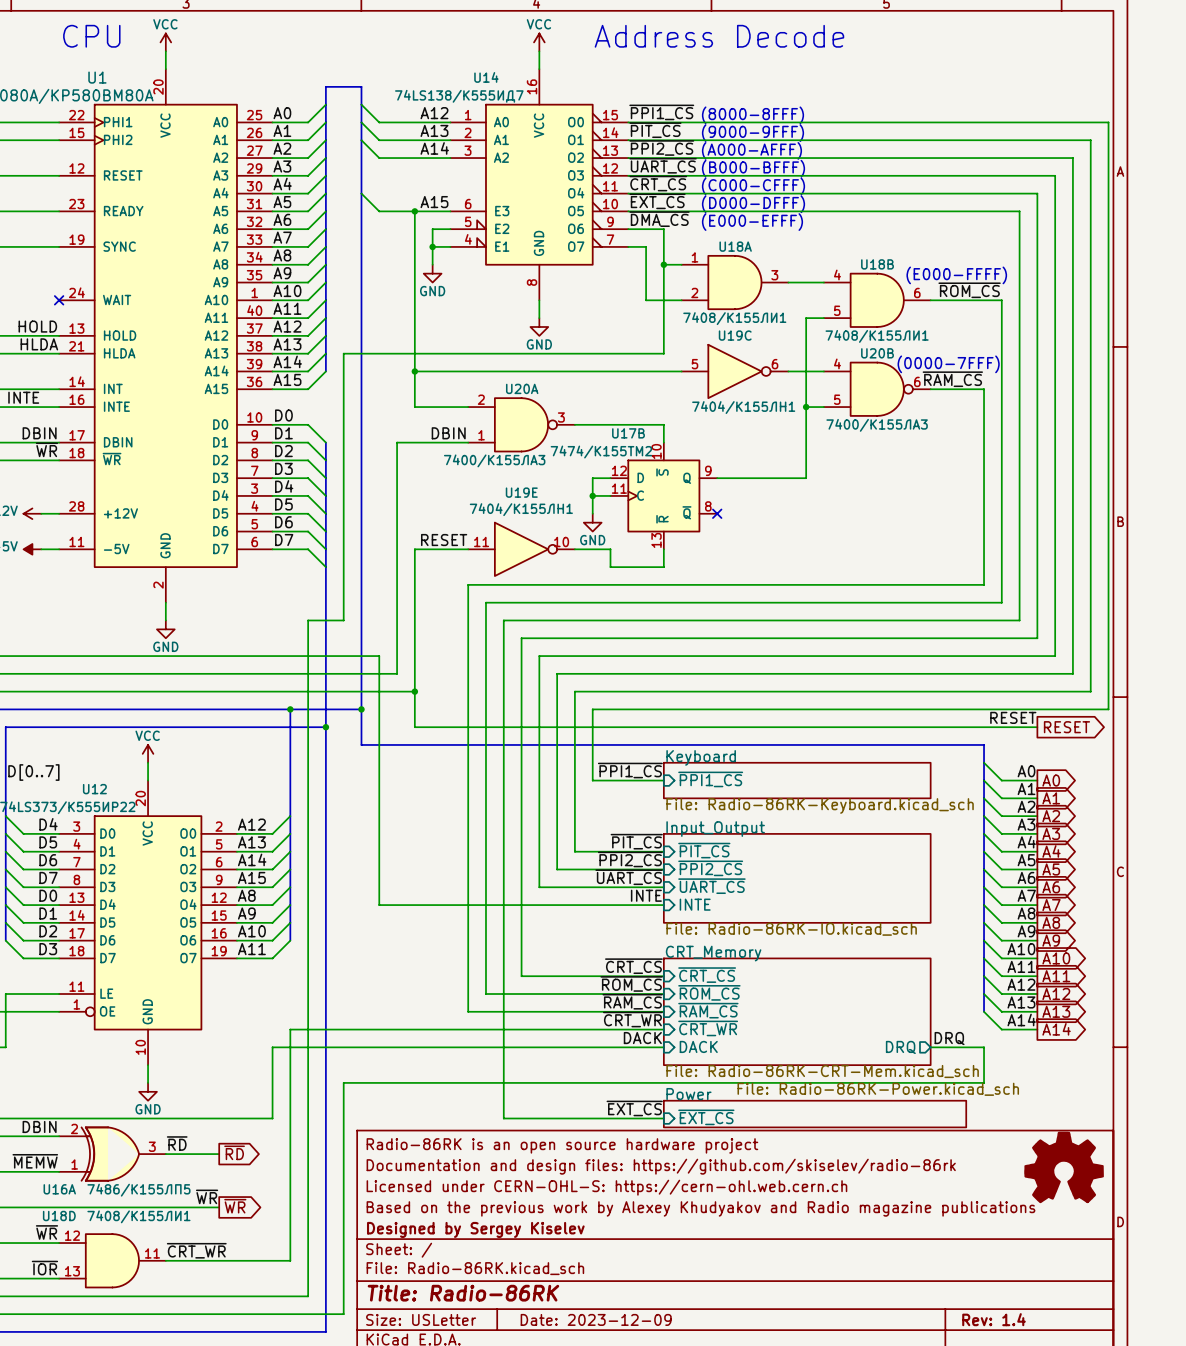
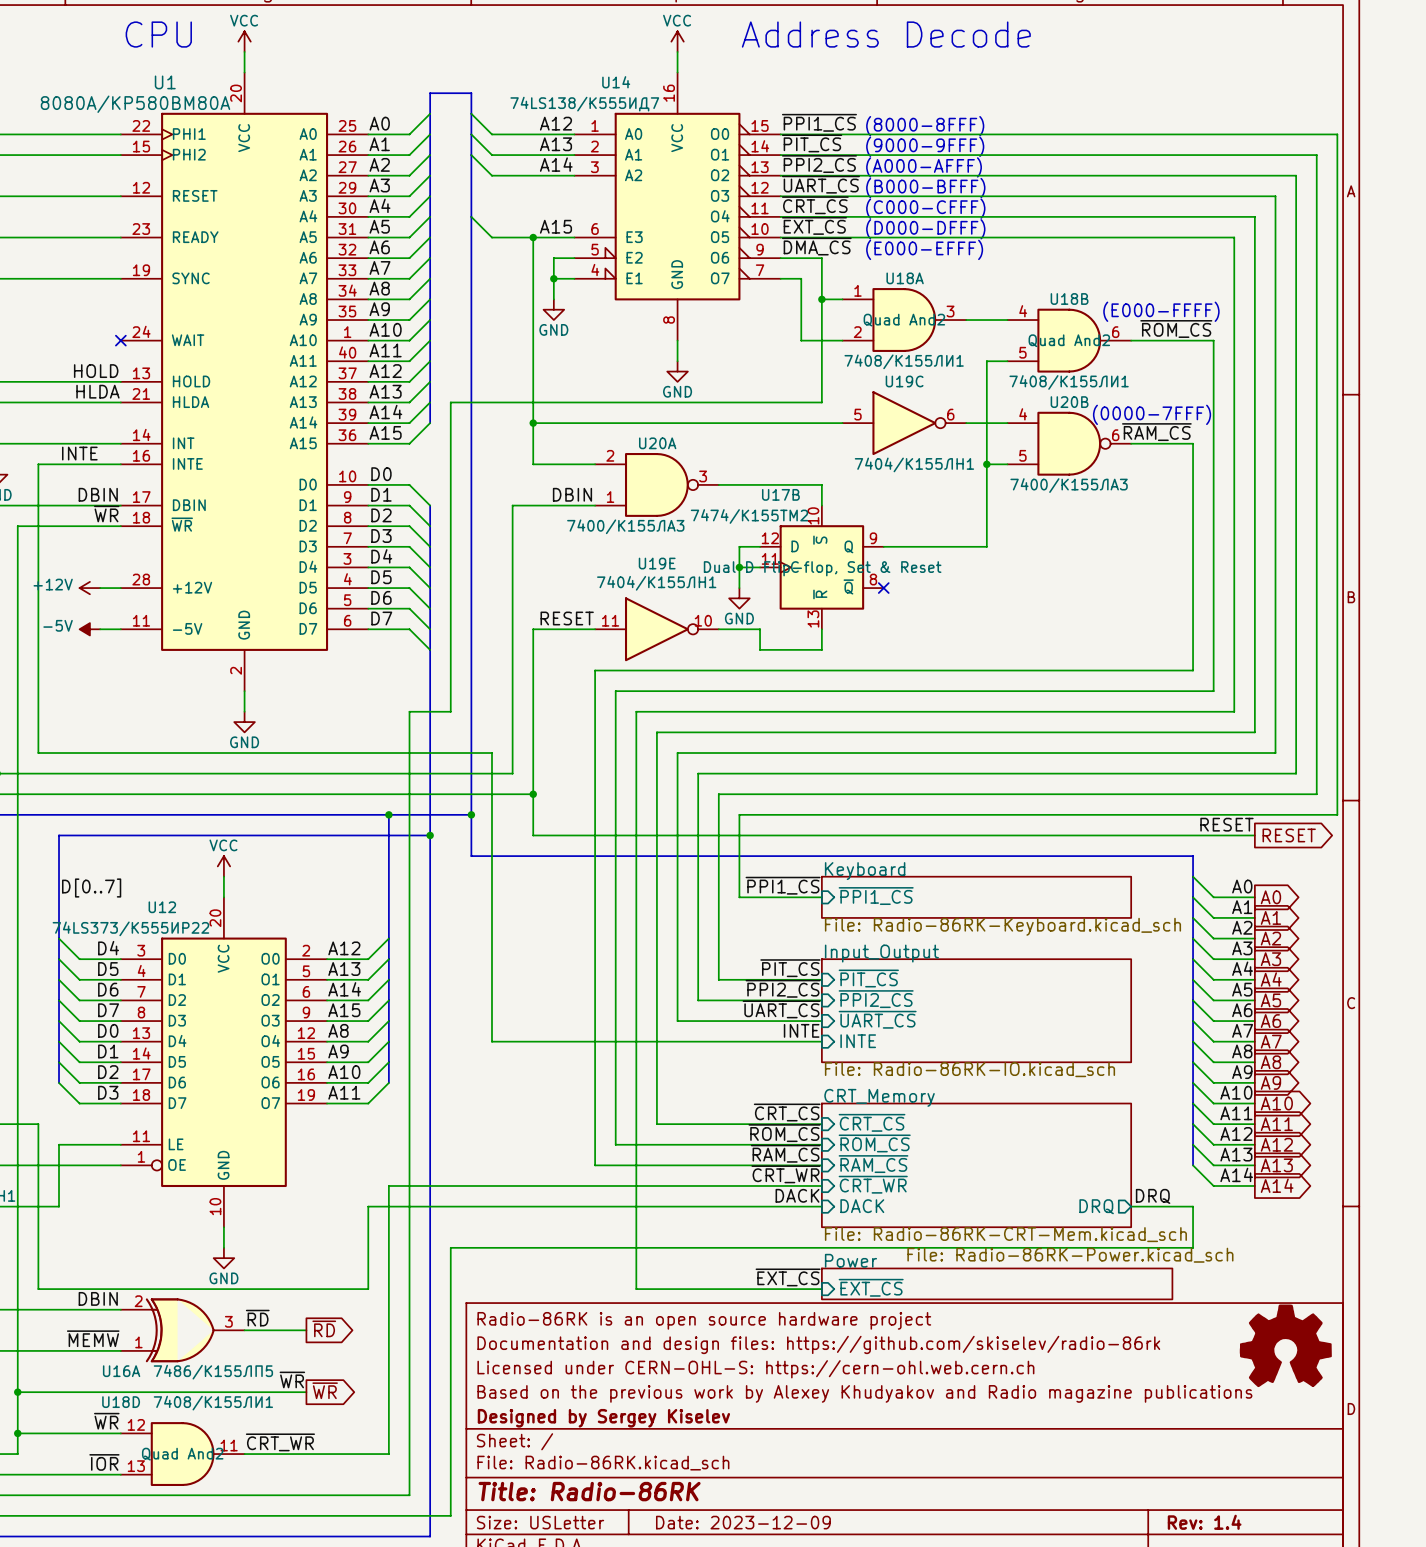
U18A text: none -> Quad And2 (904, 320)
U18B text: none -> Quad And2 (1069, 340)
U17B text: none -> Dual D Flip-flop, Set & Reset (822, 568)
U18D text: none -> Quad And2 (182, 1454)

